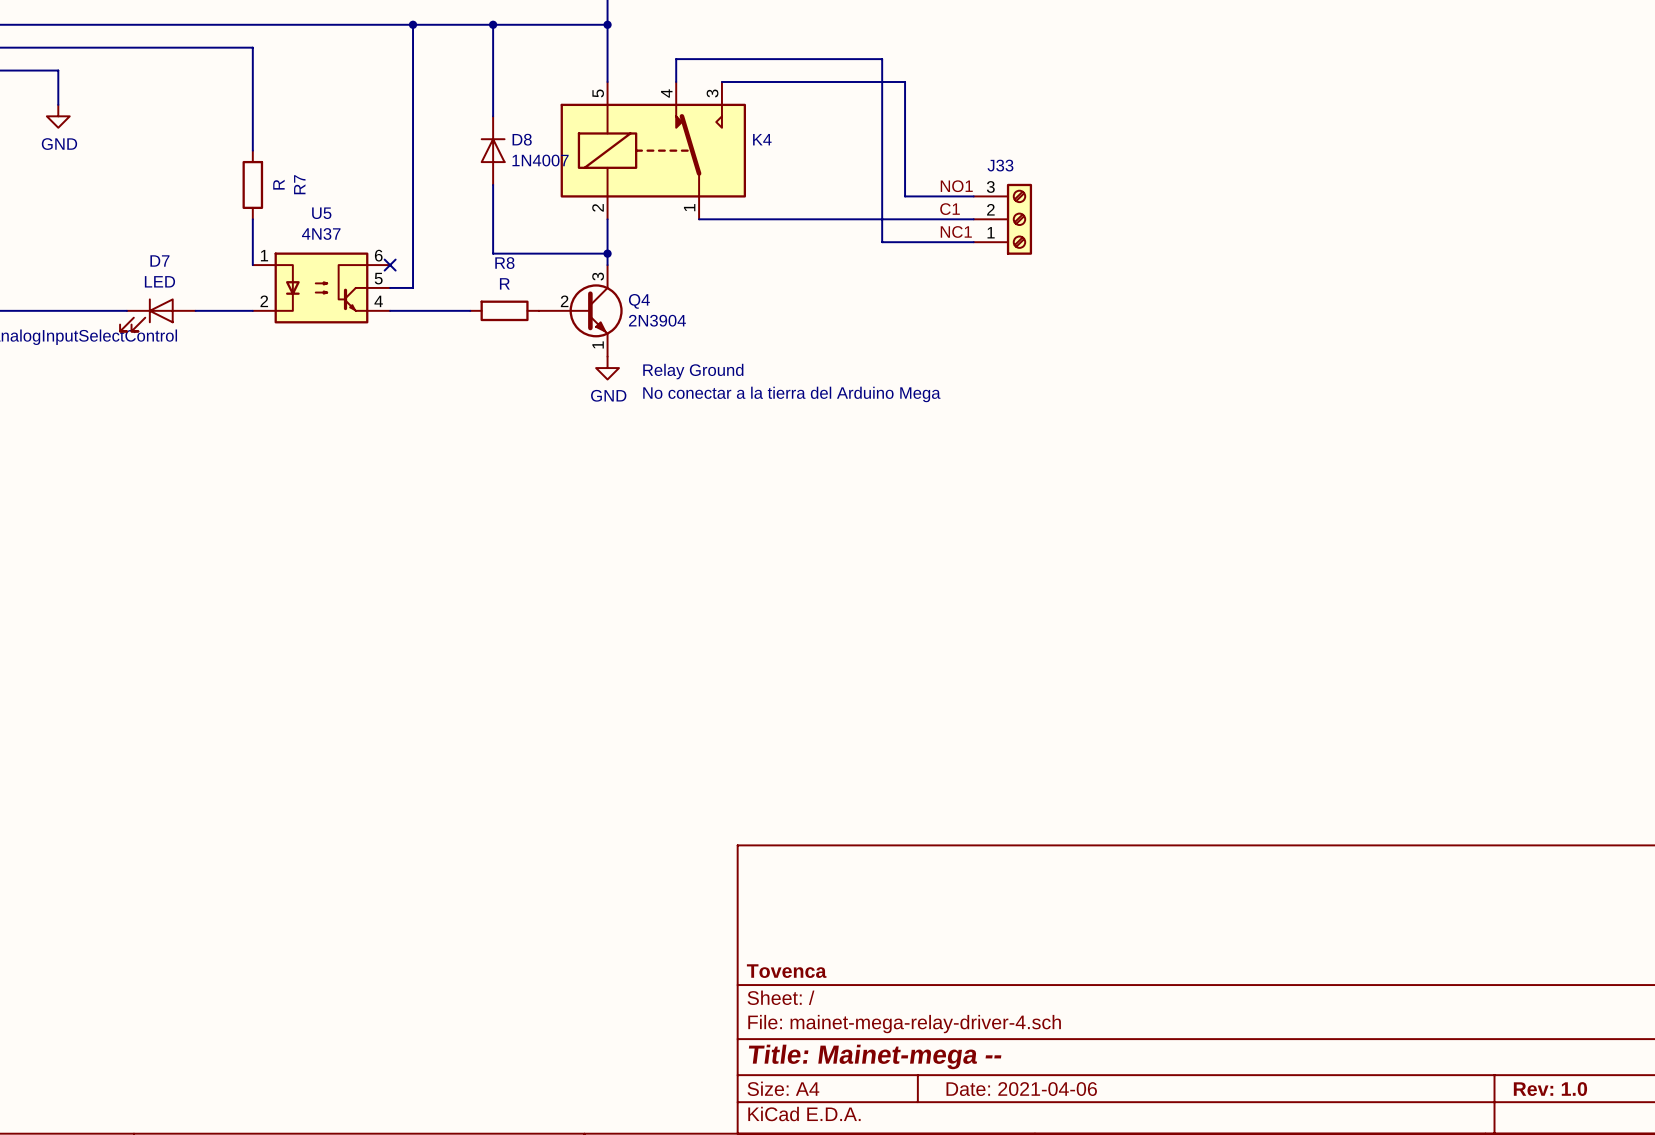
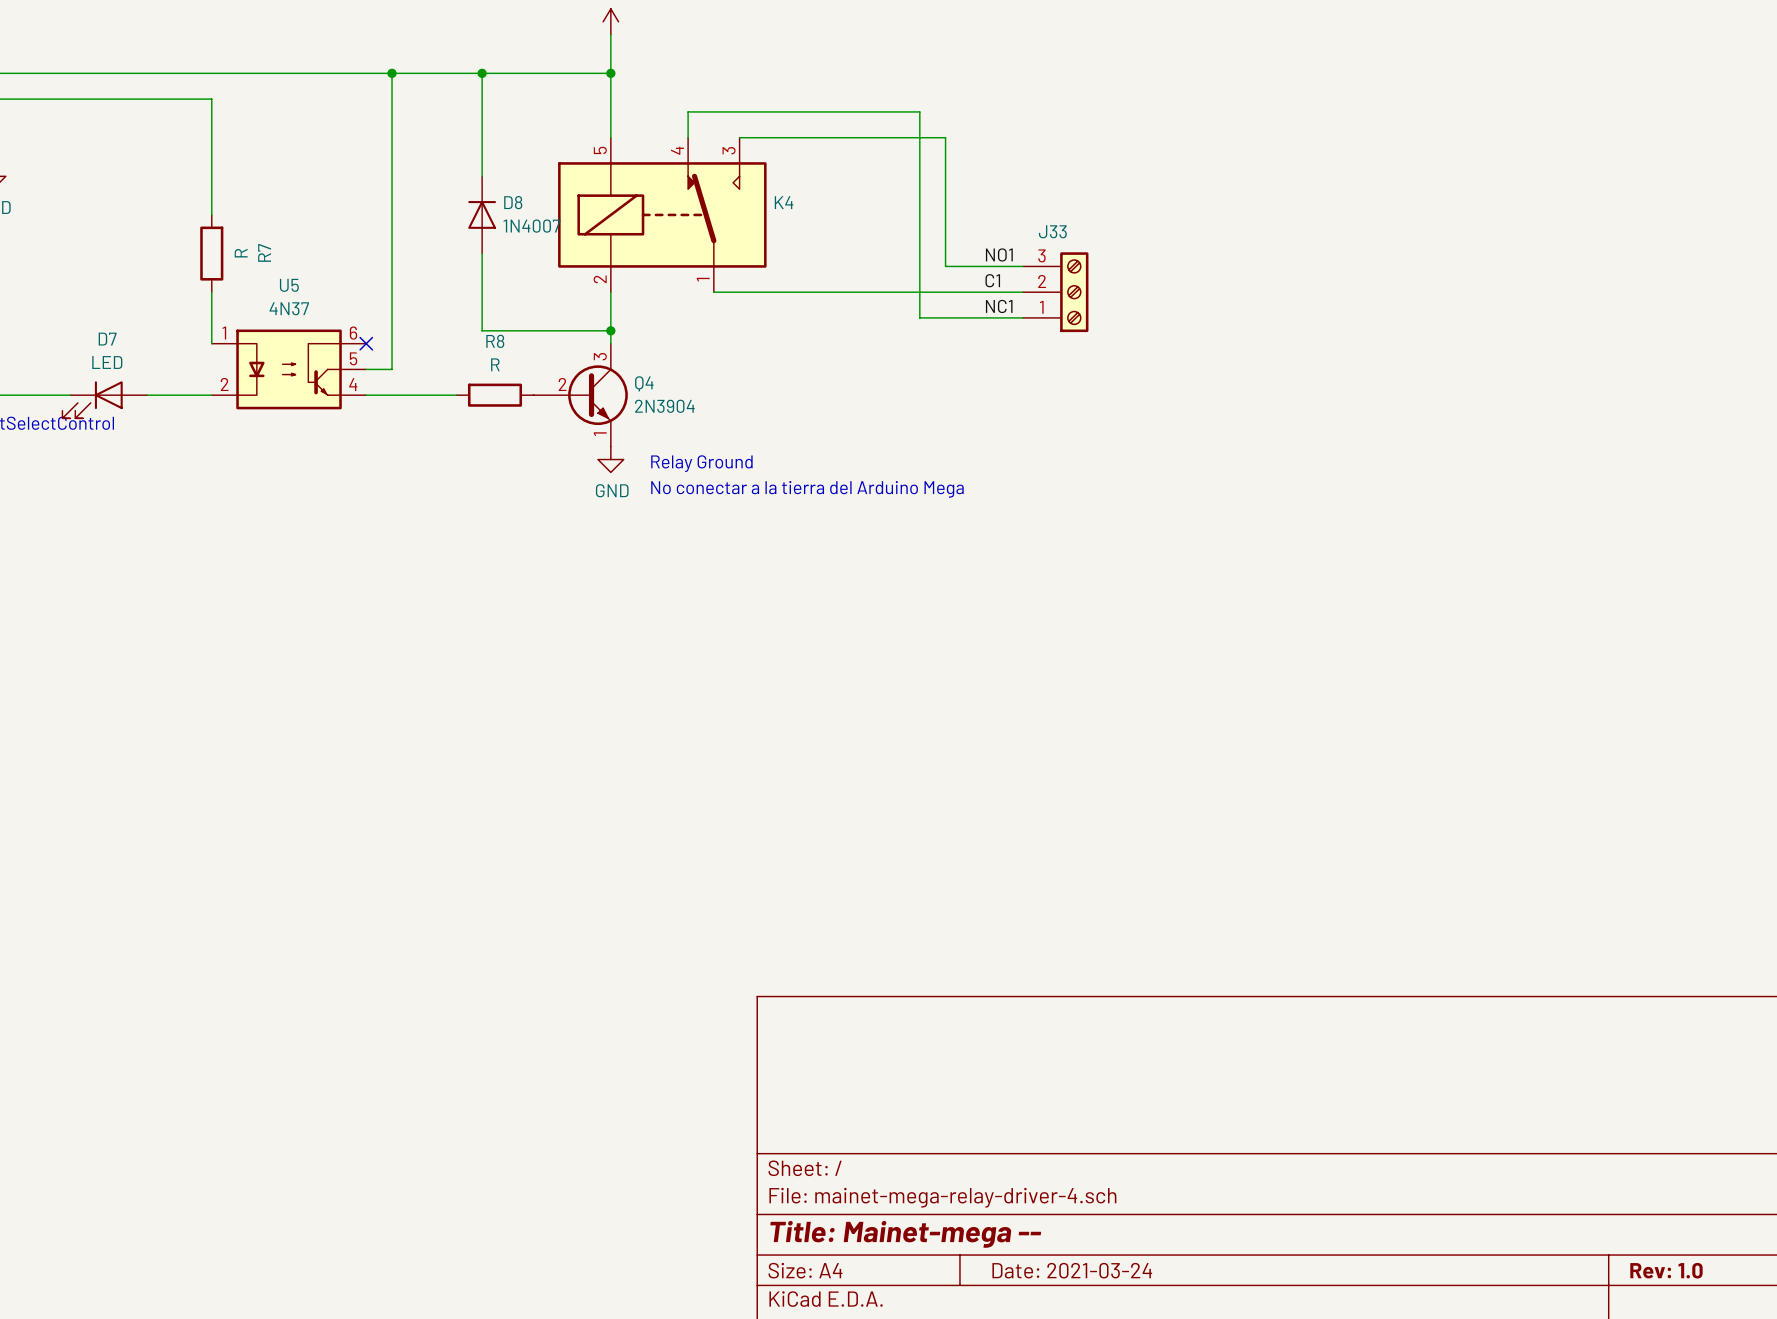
title block: Tovenca (786, 971) -> none
title block: Date: 2021-04-06 (1021, 1089) -> Date: 2021-03-24 (1072, 1270)

